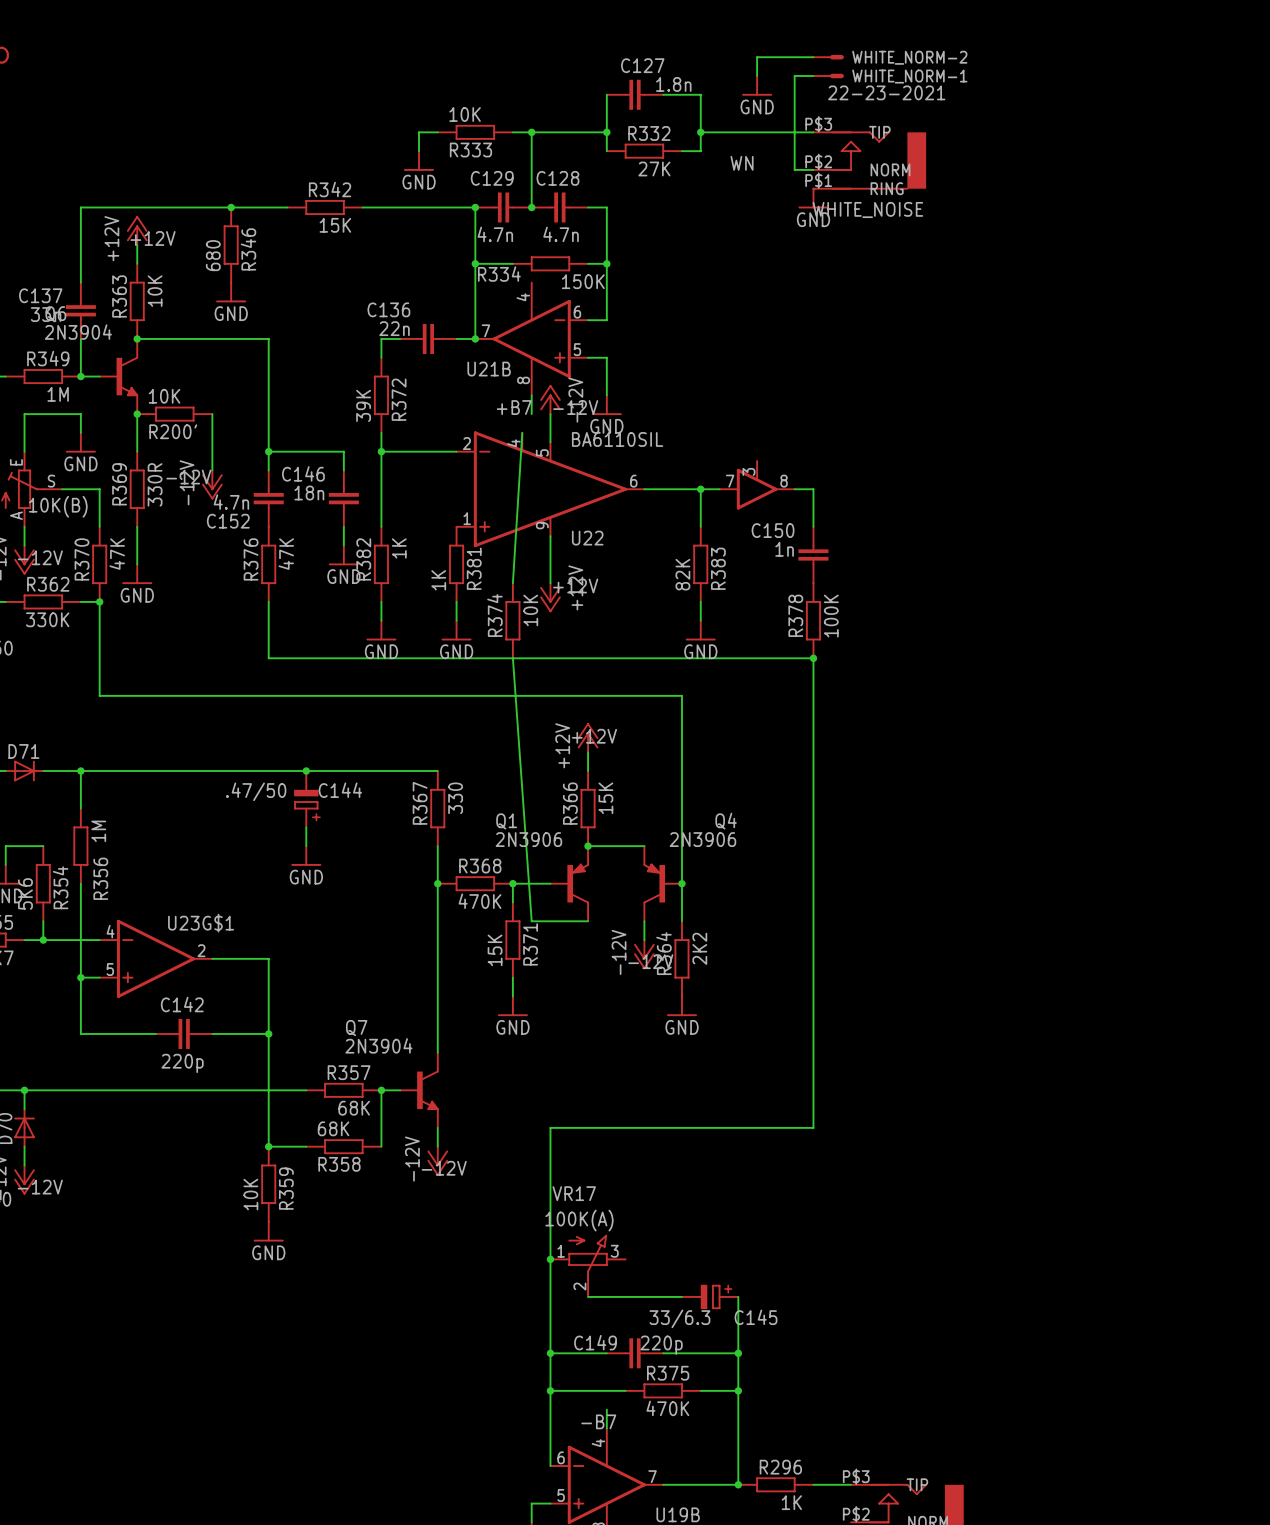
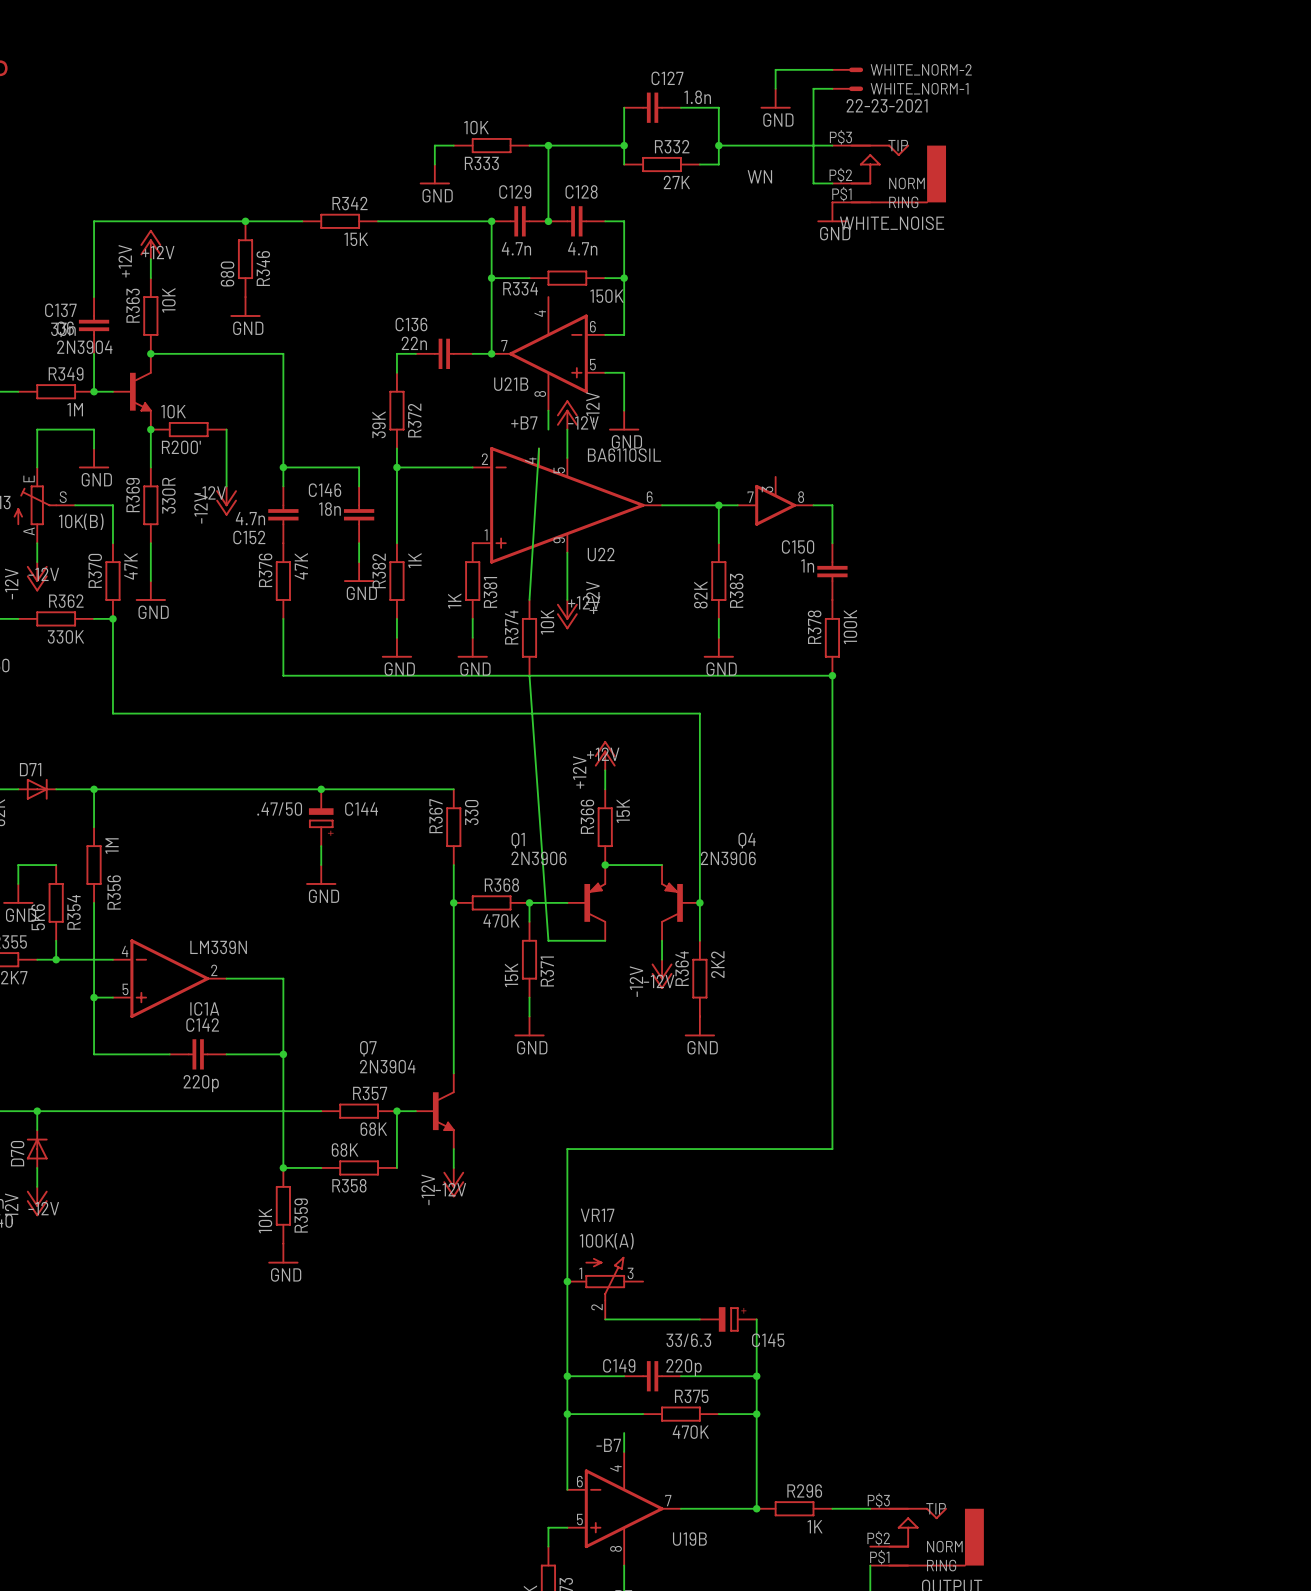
U23G$1 name: U23G$1 (201, 923) -> IC1A (204, 1008)
U23G$1 value: none -> LM339N (218, 947)

